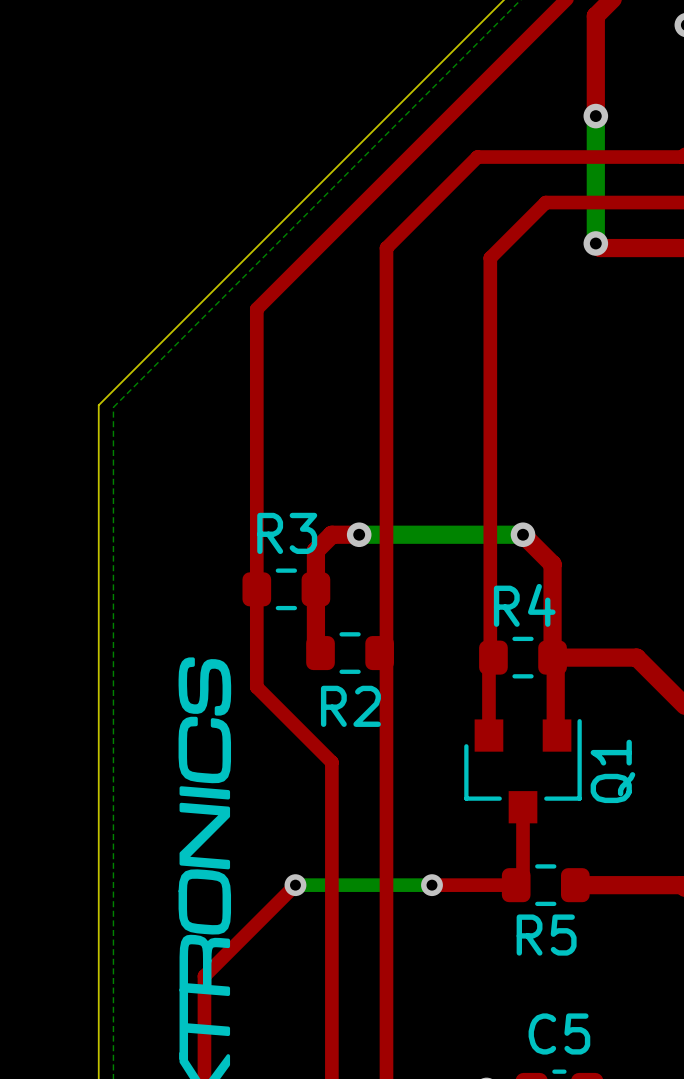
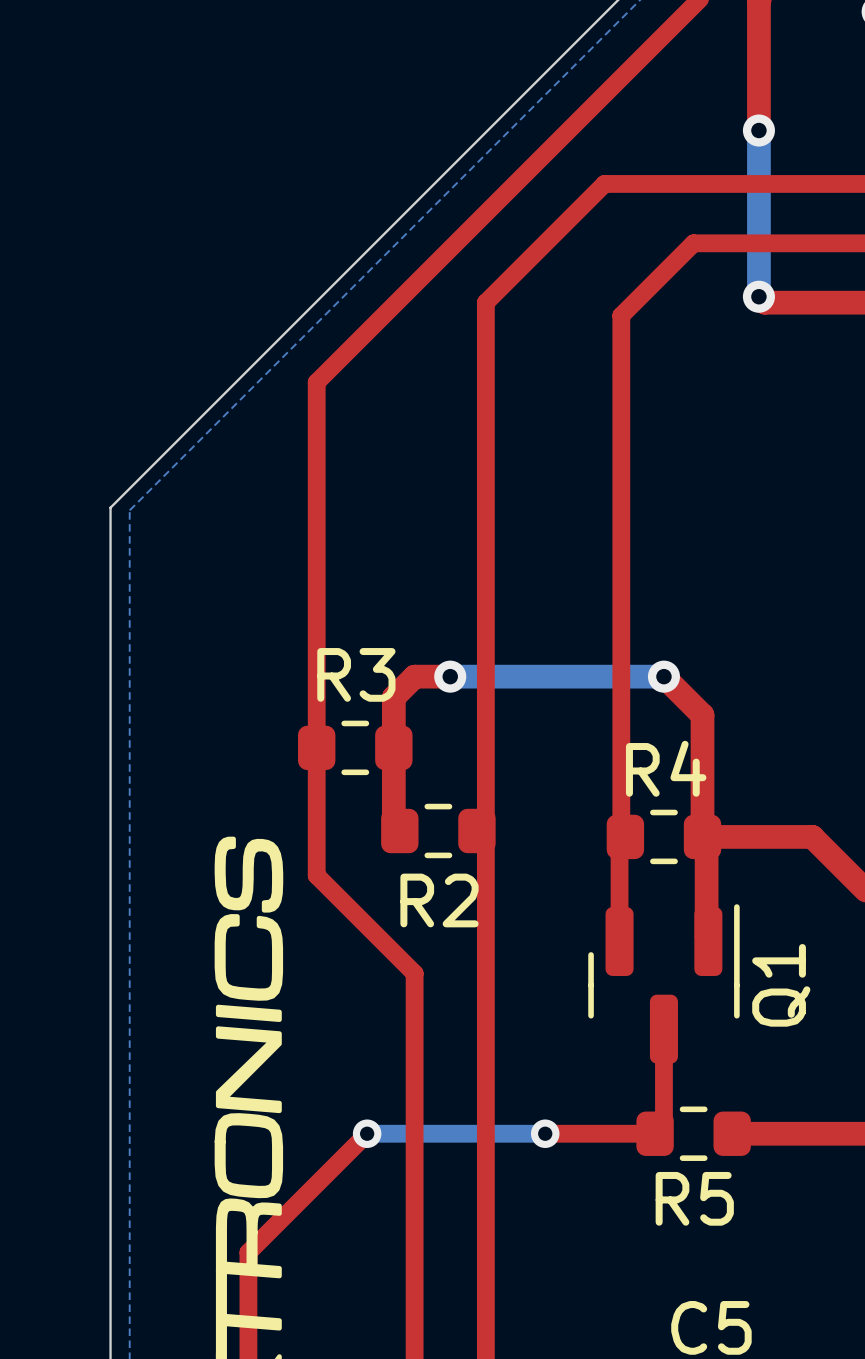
Q1 footprint: [464, 719, 582, 824] -> [588, 904, 740, 1064]

